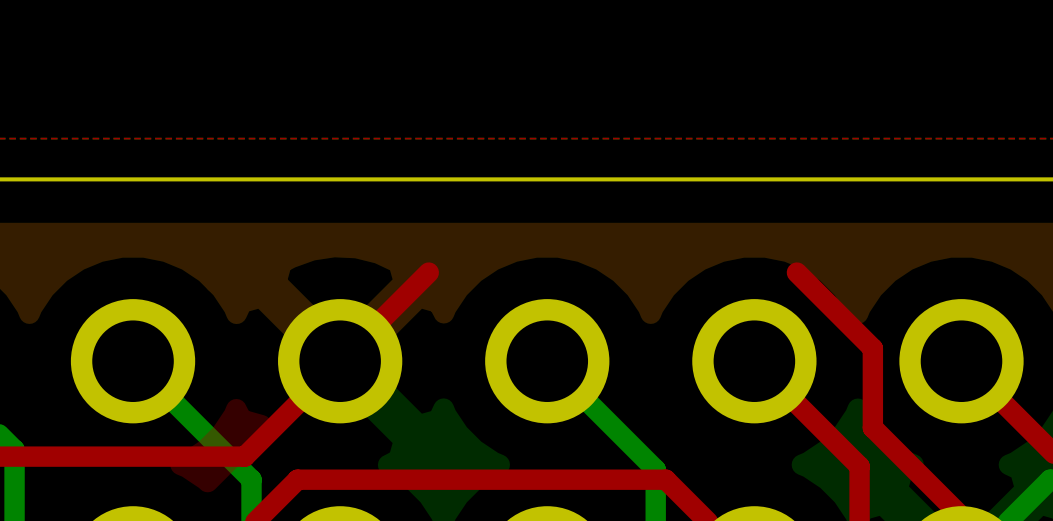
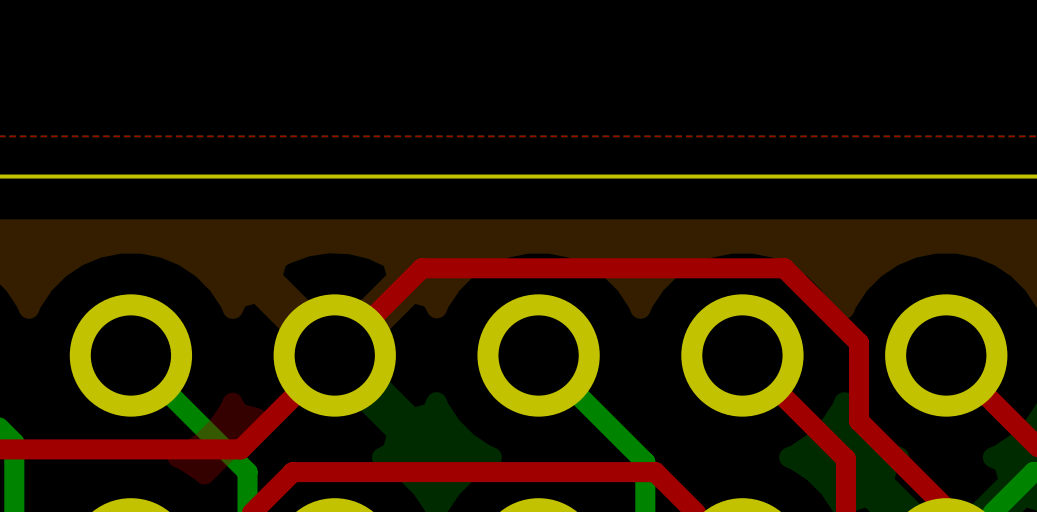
top track: none -> (421, 268) (784, 268)

